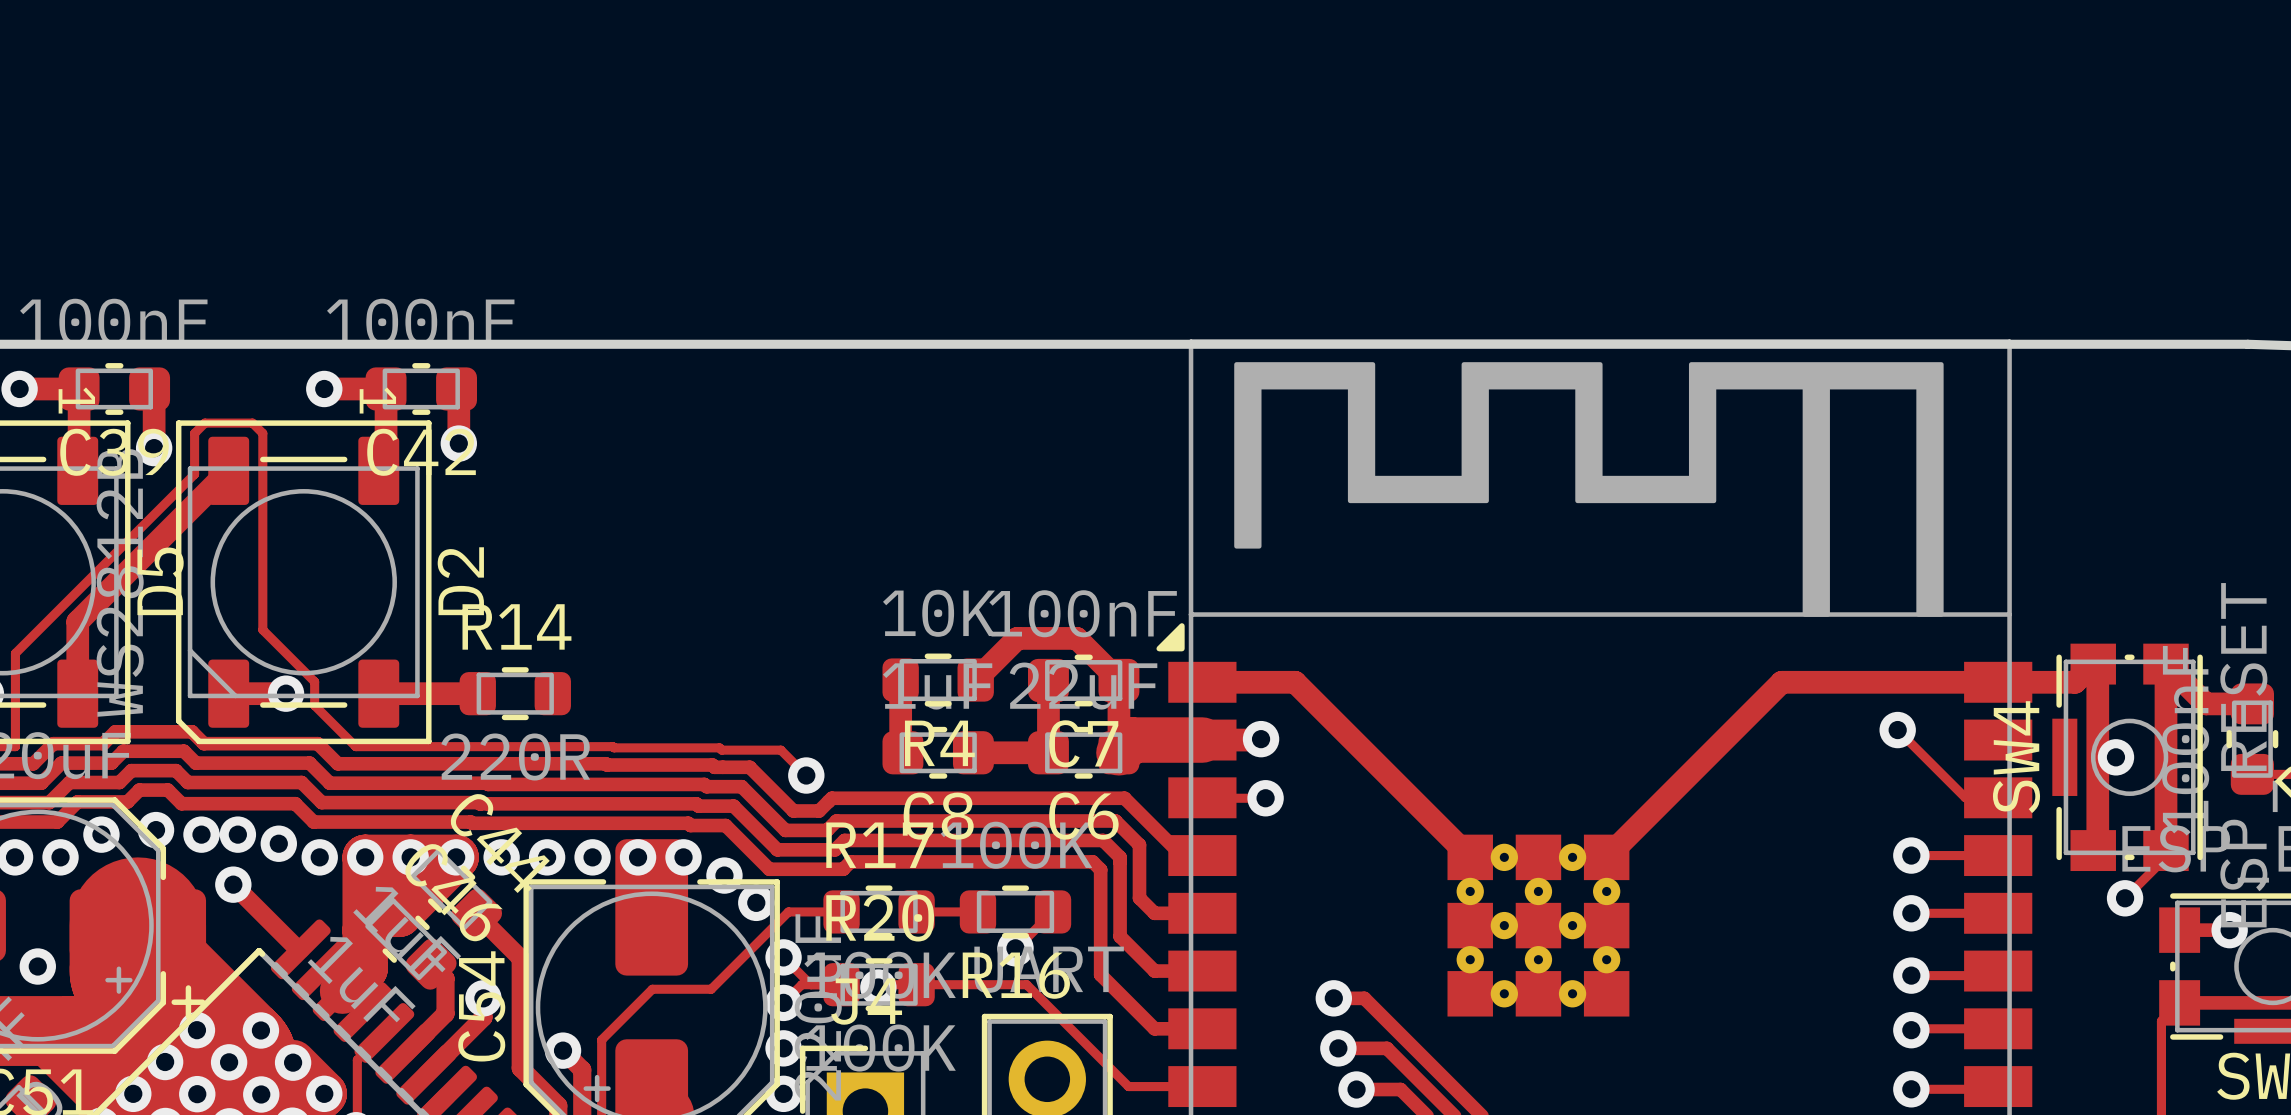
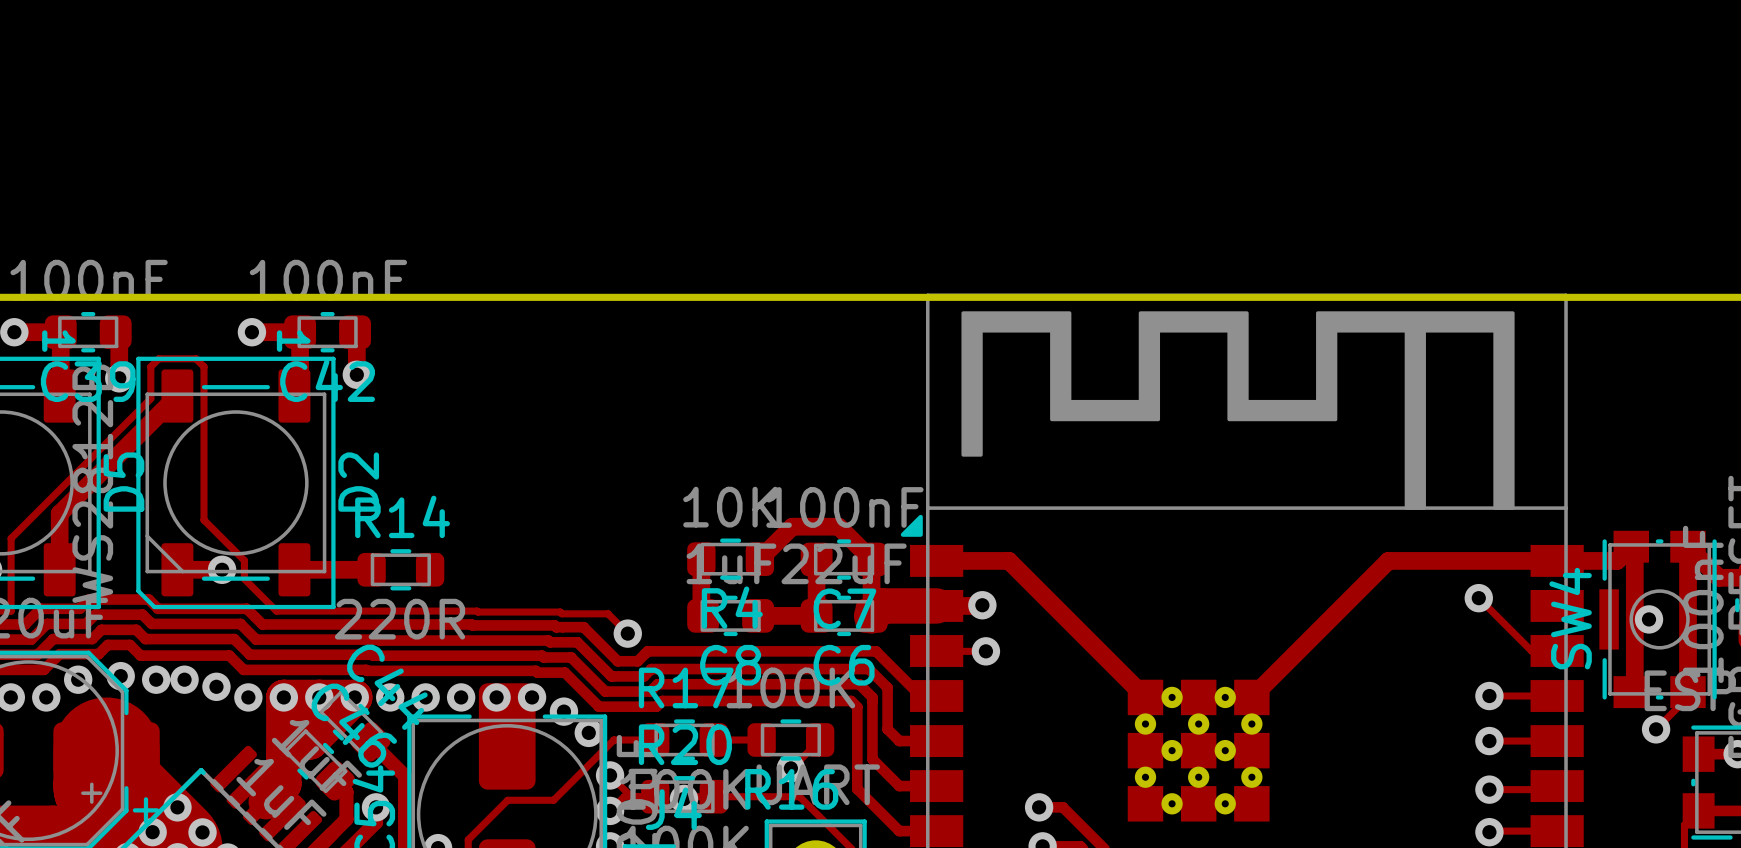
track: (233, 884) (298, 949) (300, 949) -> none
via: (233, 884) -> none
via: (37, 966) -> none
via: none -> (177, 807)

